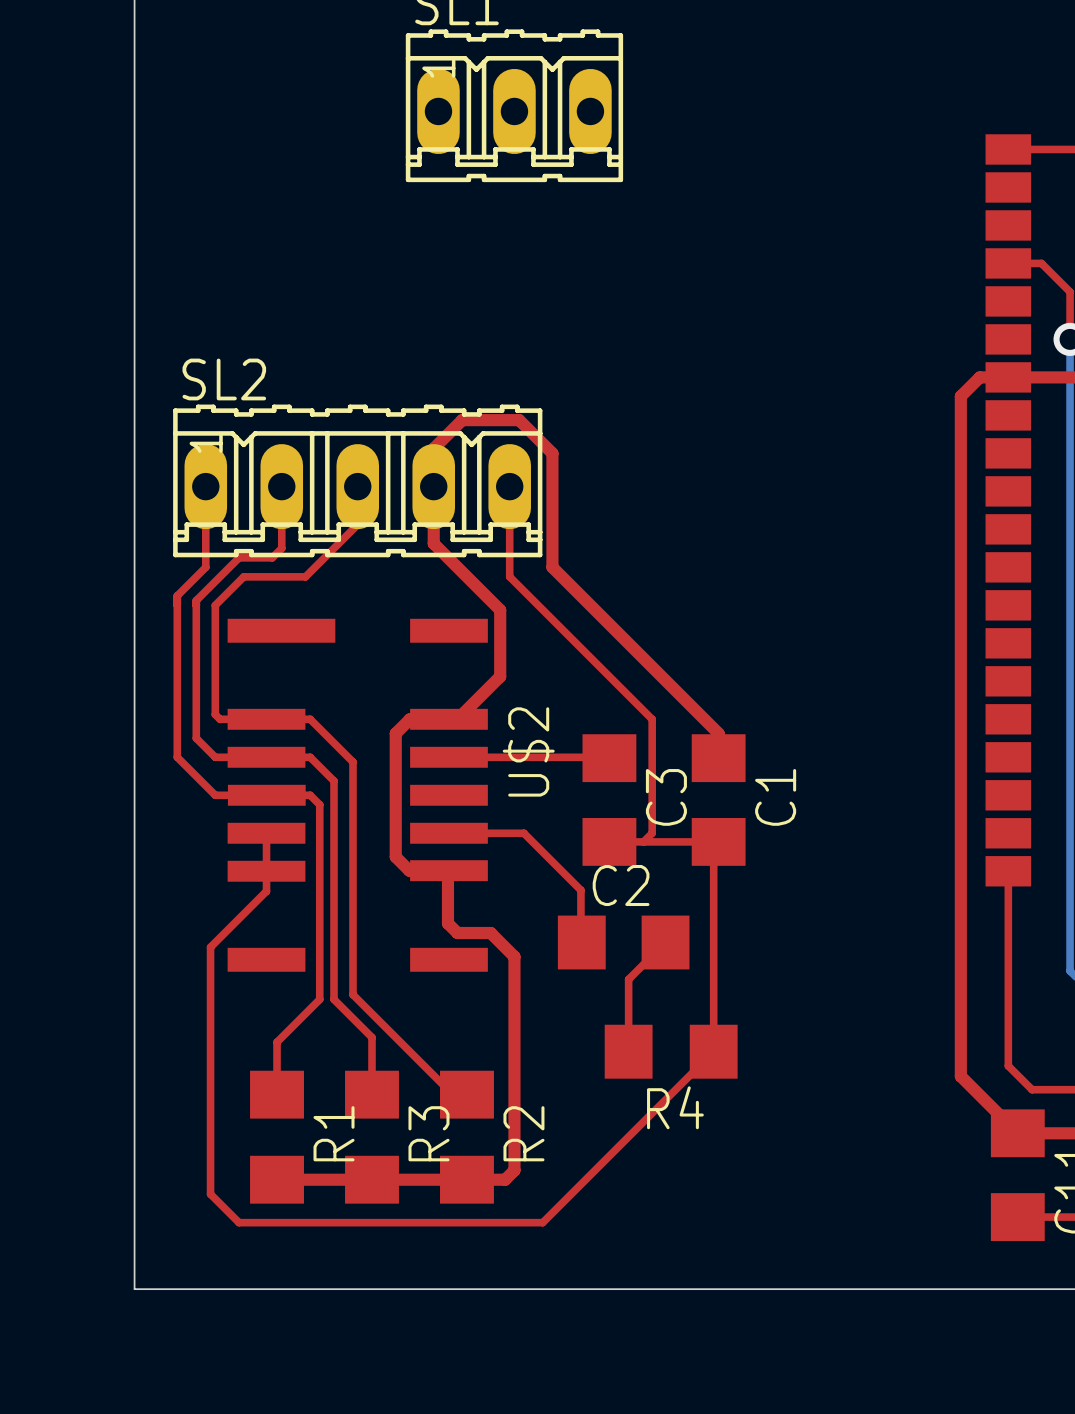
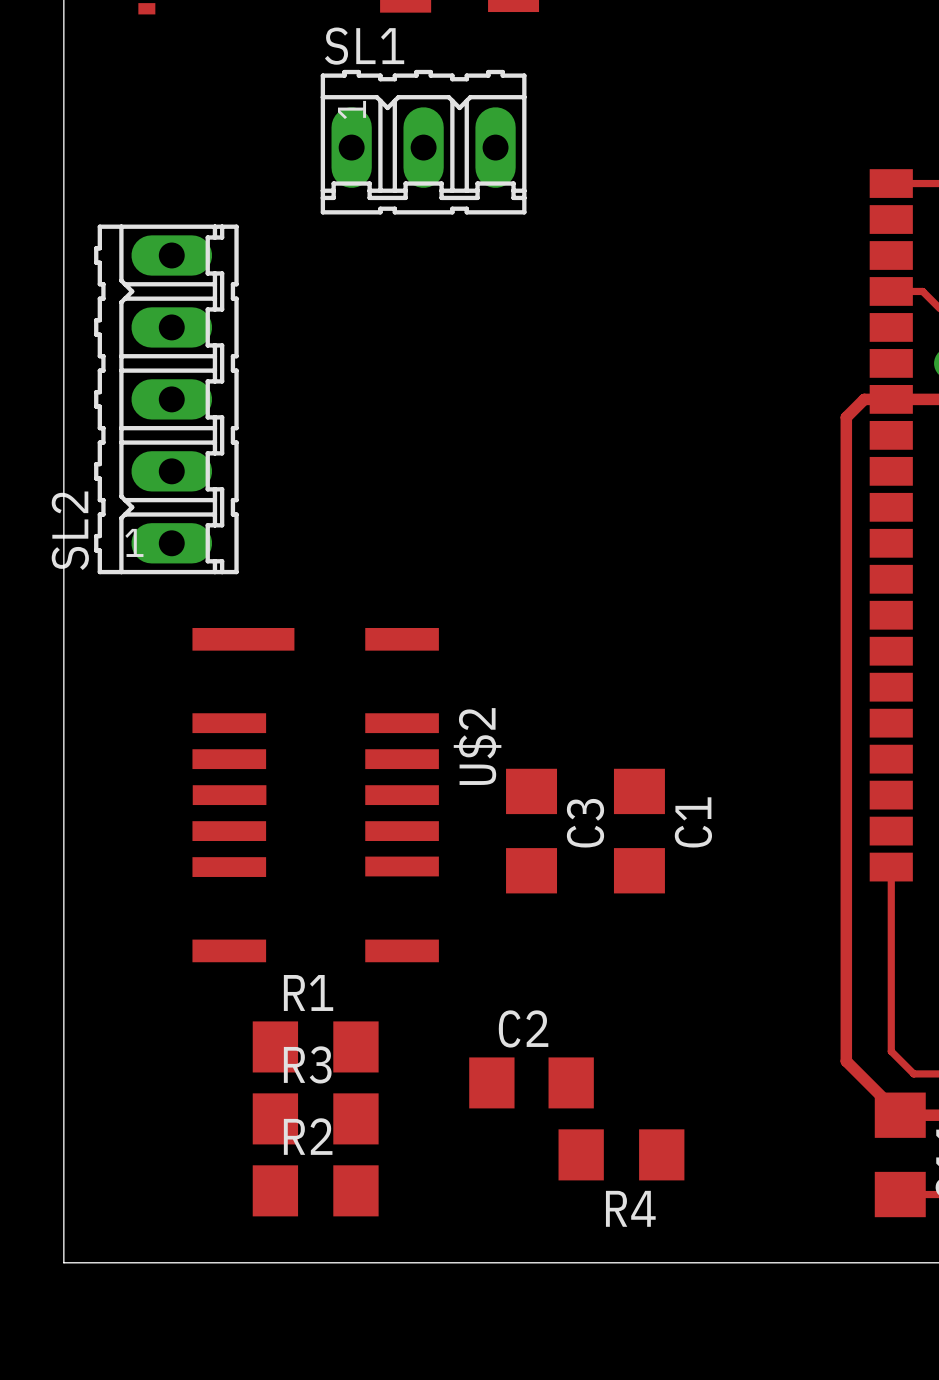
SL2 name position: SL2 (224, 379) -> SL2 (70, 530)
SL2 footprint: [173, 404, 543, 558] -> [94, 224, 239, 575]
top track: (205, 486) (205, 567) (177, 595) (177, 757) (215, 795) (310, 795) (319, 804) (319, 999) (277, 1042) (277, 1094) -> none
top track: (281, 486) (281, 548) (272, 557) (239, 557) (196, 600) (196, 738) (215, 757) (310, 757) (334, 781) (334, 999) (372, 1037) (372, 1094) -> none
top track: (357, 486) (357, 524) (305, 576) (243, 576) (215, 605) (215, 714) (220, 719) (310, 719) (353, 762) (353, 994) (452, 1094) (466, 1094) -> none
top track: (509, 486) (509, 576) (652, 719) (652, 833) (643, 841) -> none
top track: (448, 757) (609, 758) -> none
top track: (718, 758) (718, 733) (552, 567) (552, 453) (519, 420) (462, 420) (433, 448) (433, 543) (500, 610) (500, 676) (457, 719) (409, 719) (395, 733) (395, 857) (409, 870) (448, 870) (447, 923) (457, 932) (490, 932) (514, 956) (514, 1170) (505, 1179) (277, 1179) -> none
U$2 position: (357, 795) -> (315, 795)
C3 position: (609, 800) -> (531, 831)
C1 position: (718, 800) -> (639, 831)
top track: (266, 833) (266, 891) (210, 947) (210, 1194) (239, 1222) (542, 1222) (713, 1051) (713, 846) (718, 841) (609, 841) -> none
top track: (448, 833) (523, 833) (580, 890) (581, 942) -> none
C2 position: (623, 942) -> (531, 1082)
top track: (665, 942) (628, 979) (628, 1051) -> none
R4 position: (671, 1051) -> (621, 1154)
R1 name position: R1 (334, 1133) -> R1 (308, 992)
R3 name position: R3 (428, 1133) -> R3 (307, 1064)
R2 name position: R2 (523, 1133) -> R2 (308, 1136)
R1 rotation: 0° (277, 1137) -> 90° clockwise (315, 1046)
R1 position: (277, 1137) -> (315, 1046)
R3 rotation: 0° (372, 1137) -> 90° clockwise (315, 1118)
R2 rotation: 0° (466, 1137) -> 90° clockwise (315, 1190)
R2 position: (466, 1137) -> (315, 1190)

